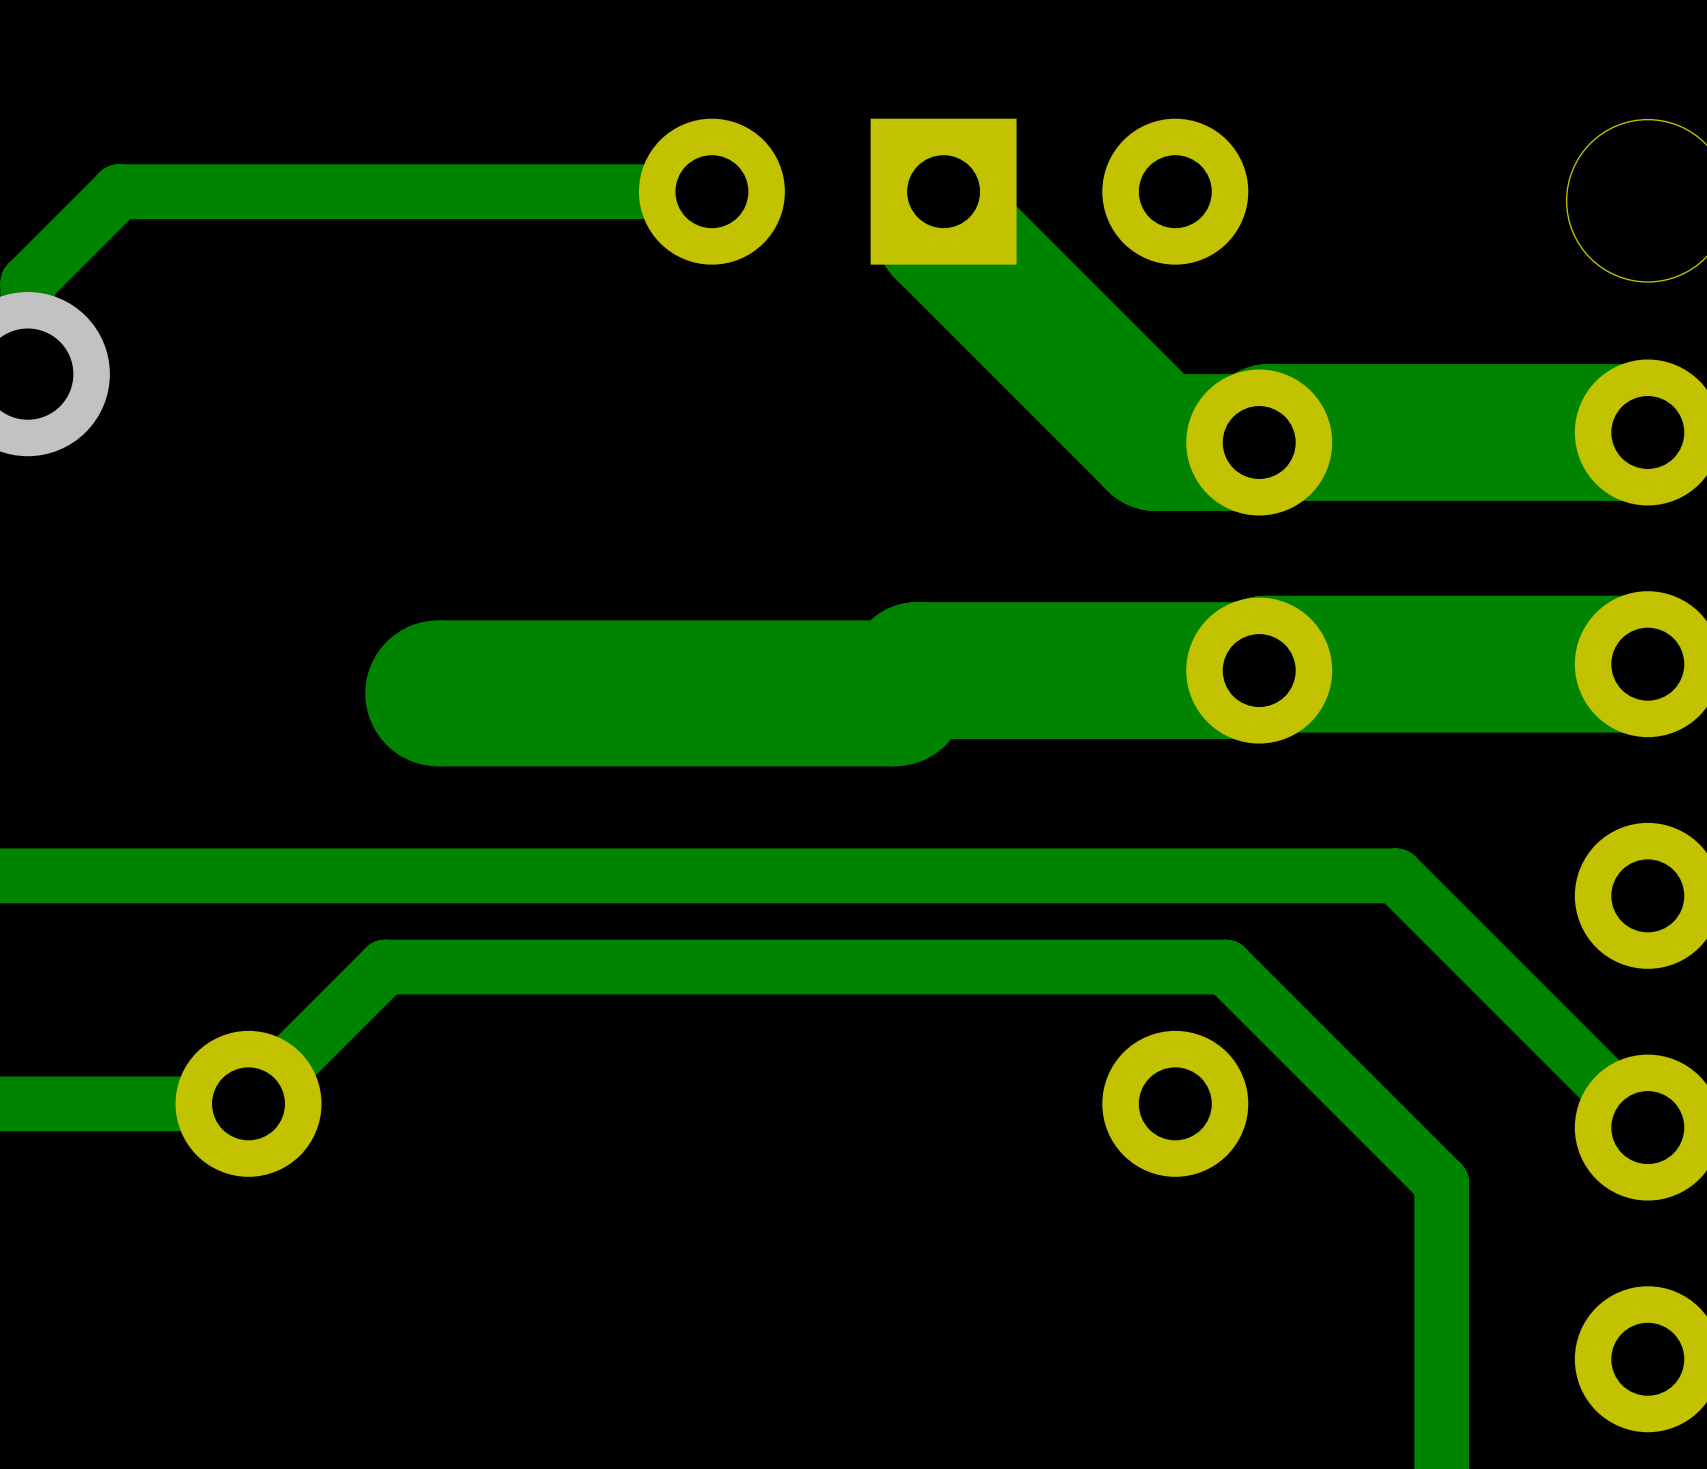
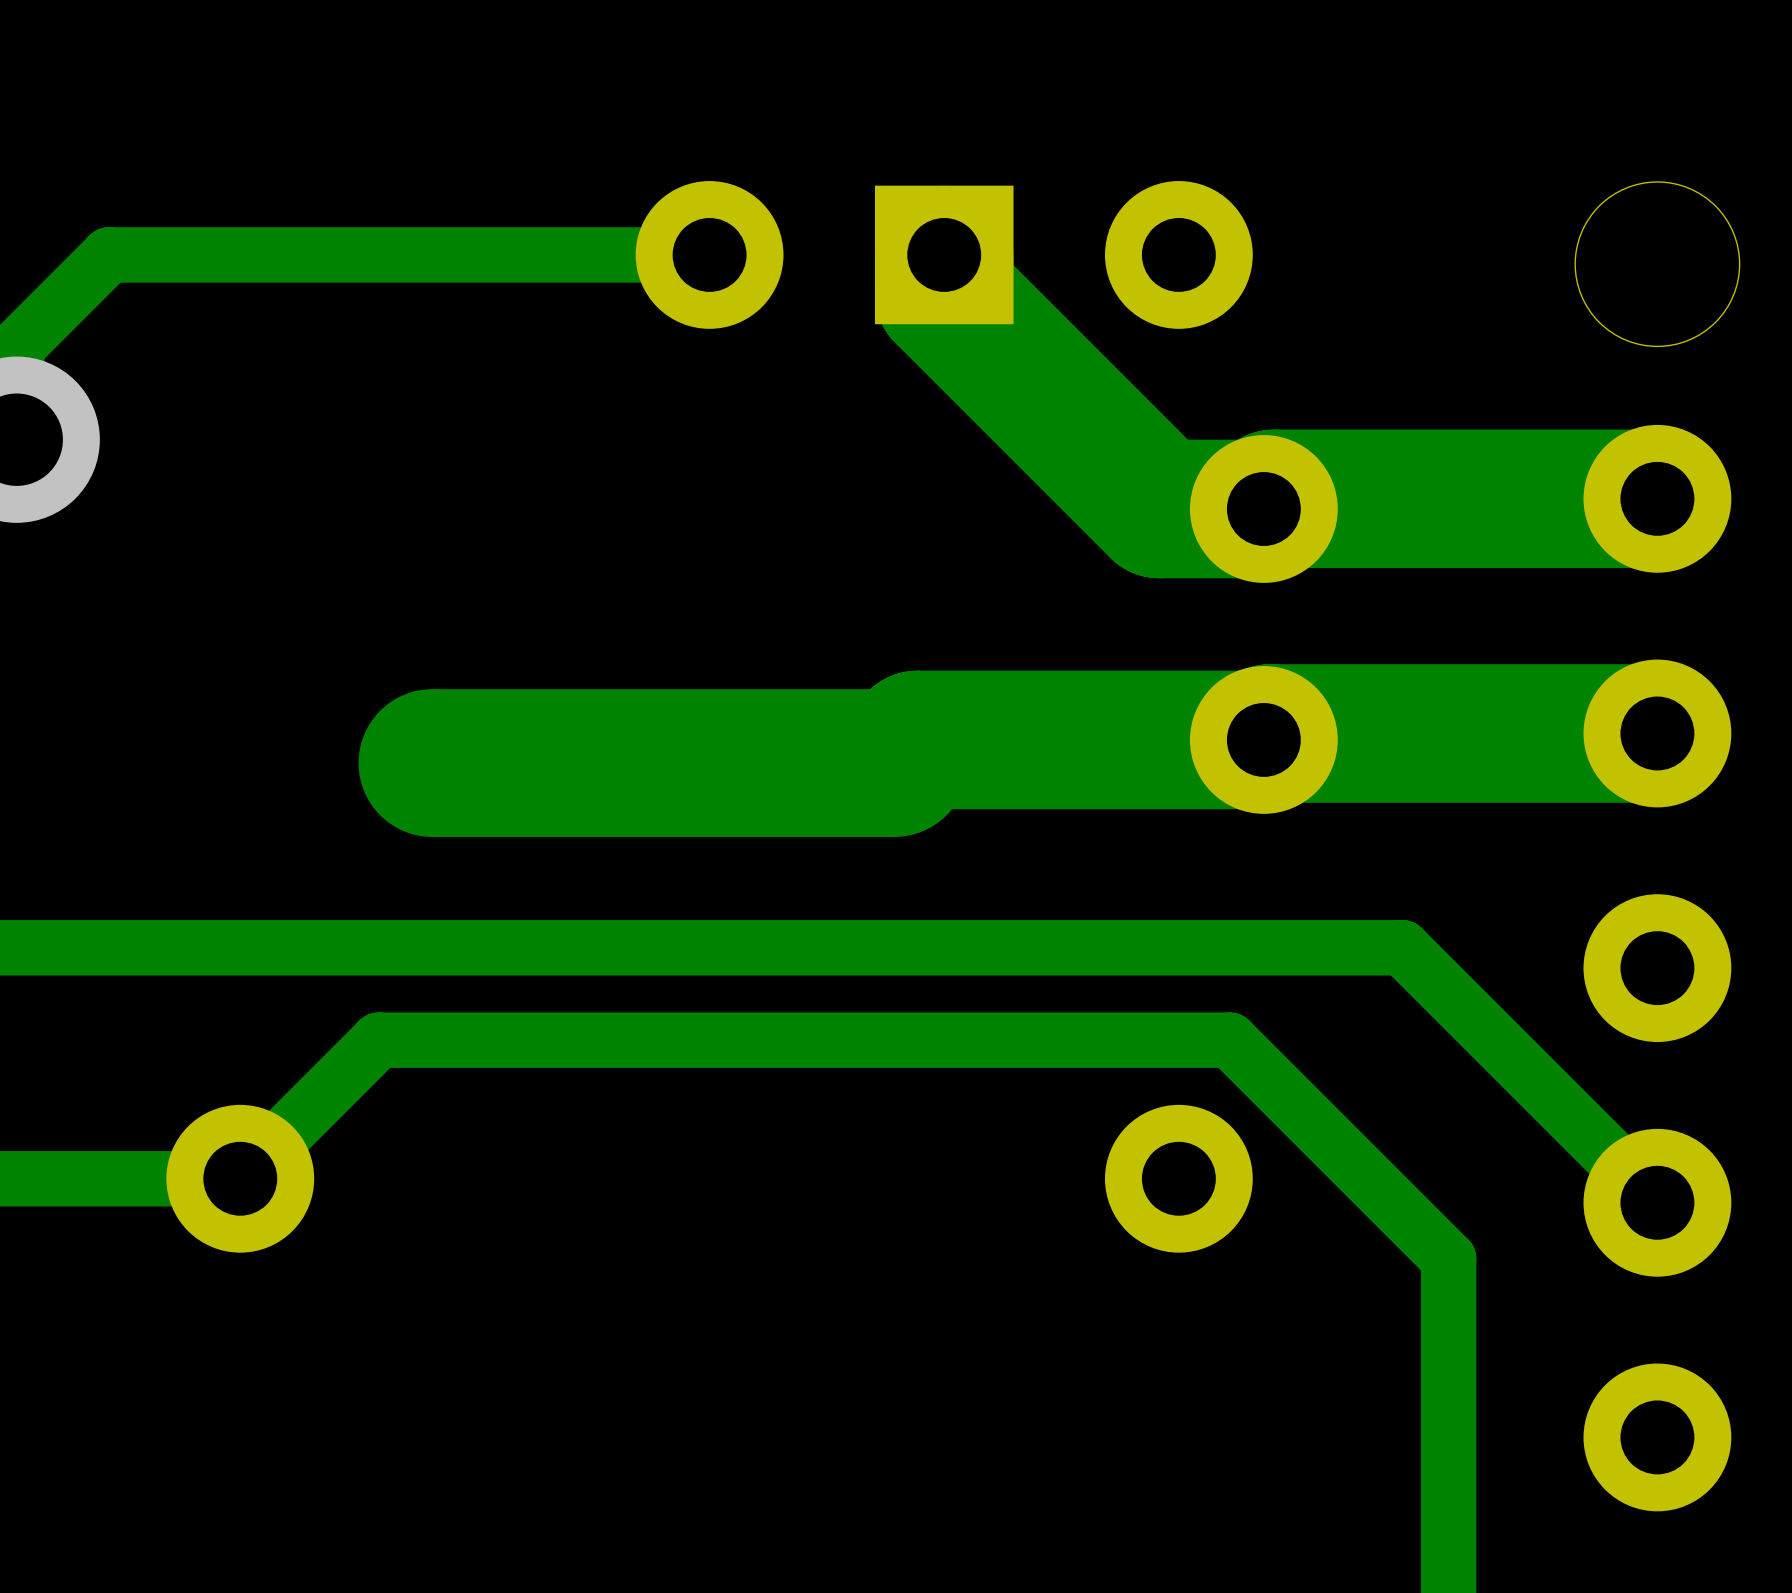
part footprint: [638, 118, 1249, 265] -> [635, 181, 1253, 329]

